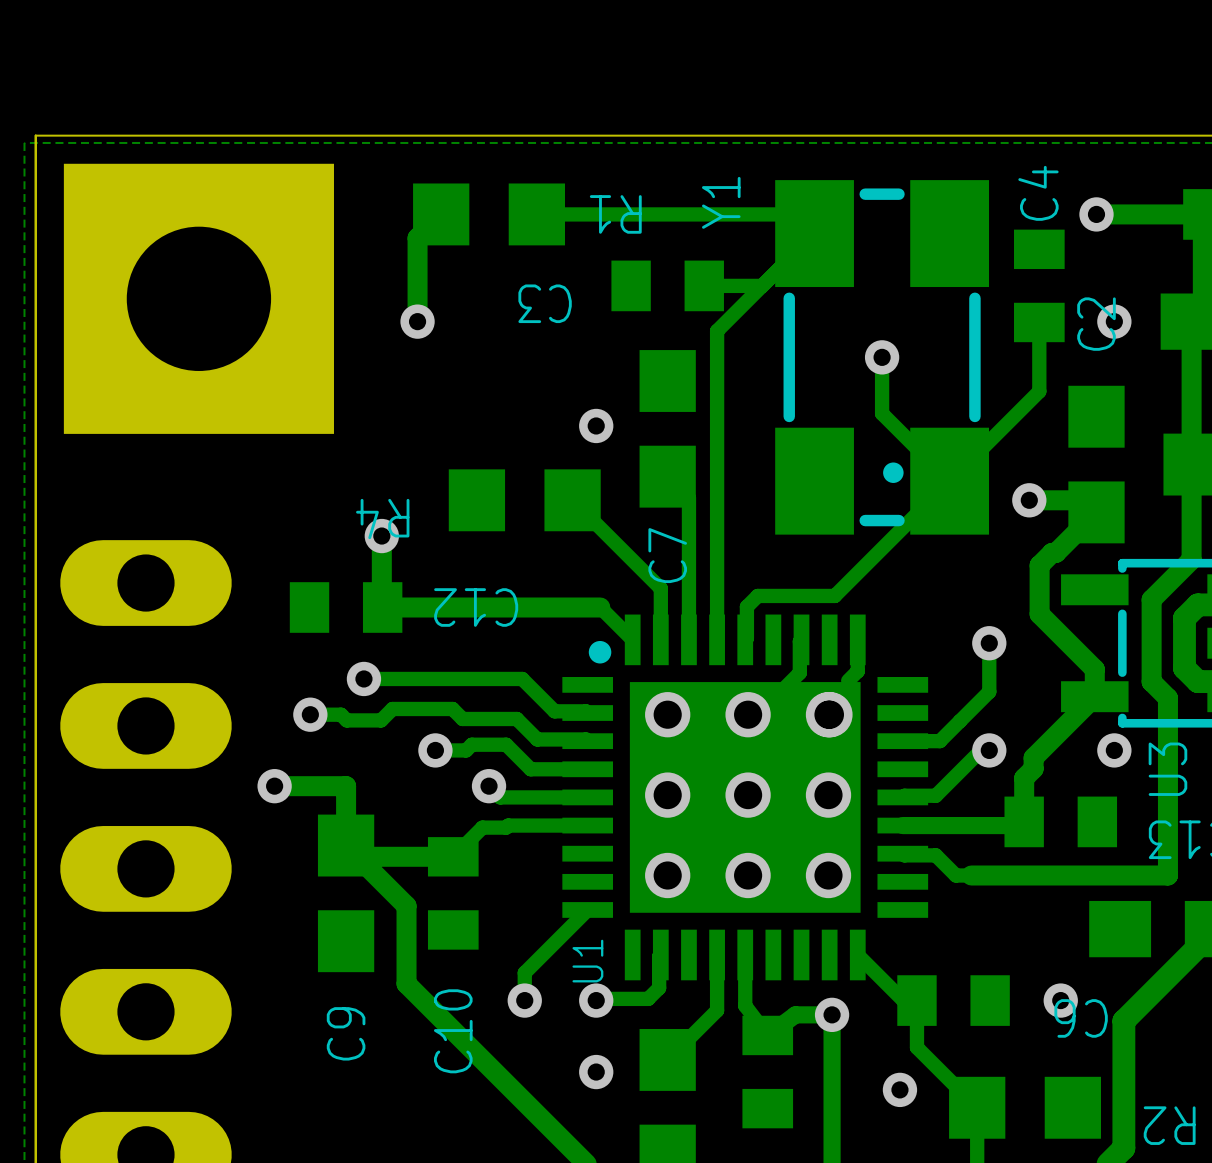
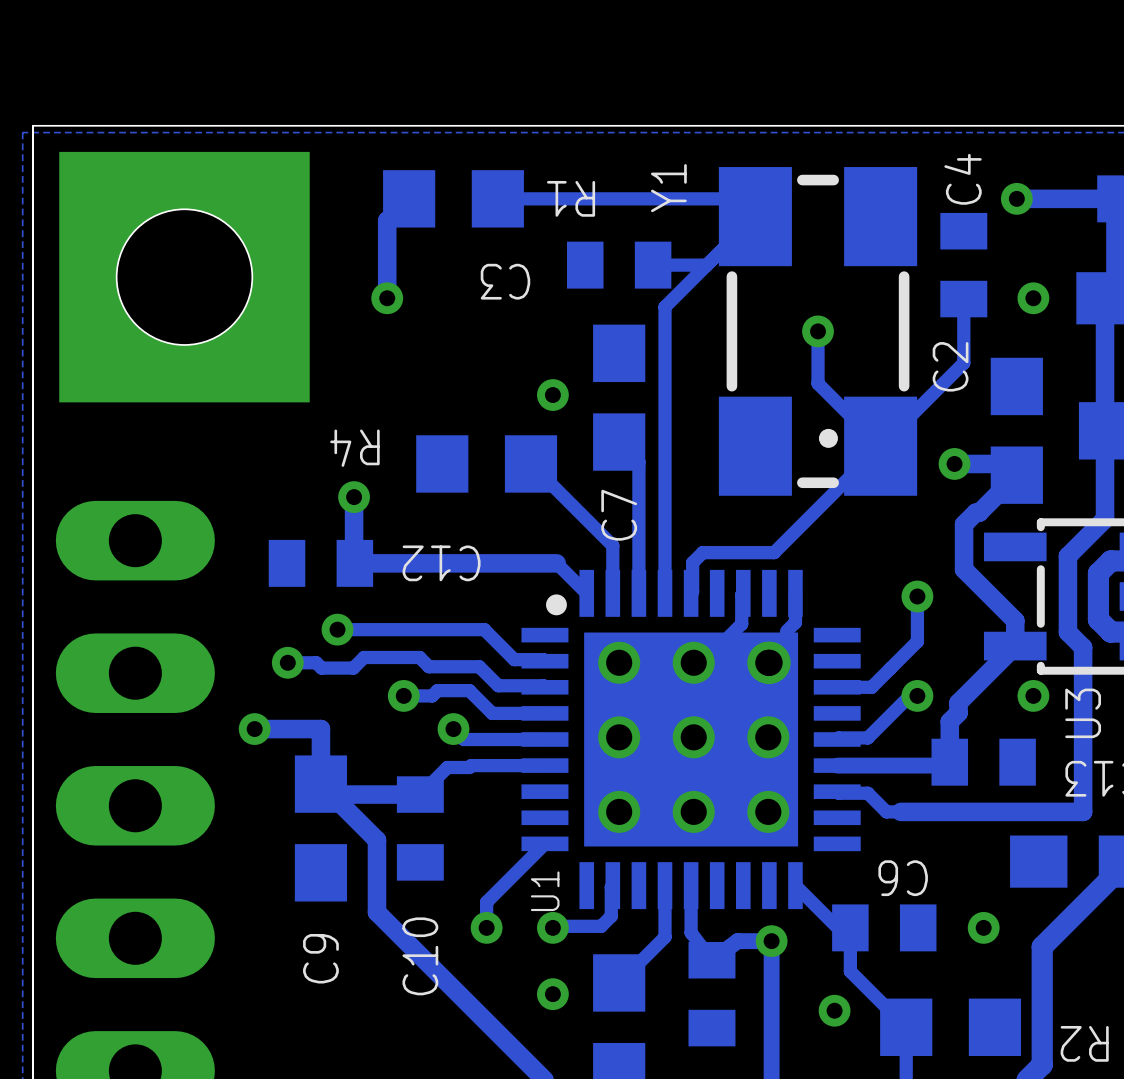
C2 name position: C2 (1096, 324) -> C2 (950, 366)
R4 name position: R4 (382, 519) -> R4 (354, 448)
C6 name position: C6 (1081, 1018) -> C6 (903, 878)

